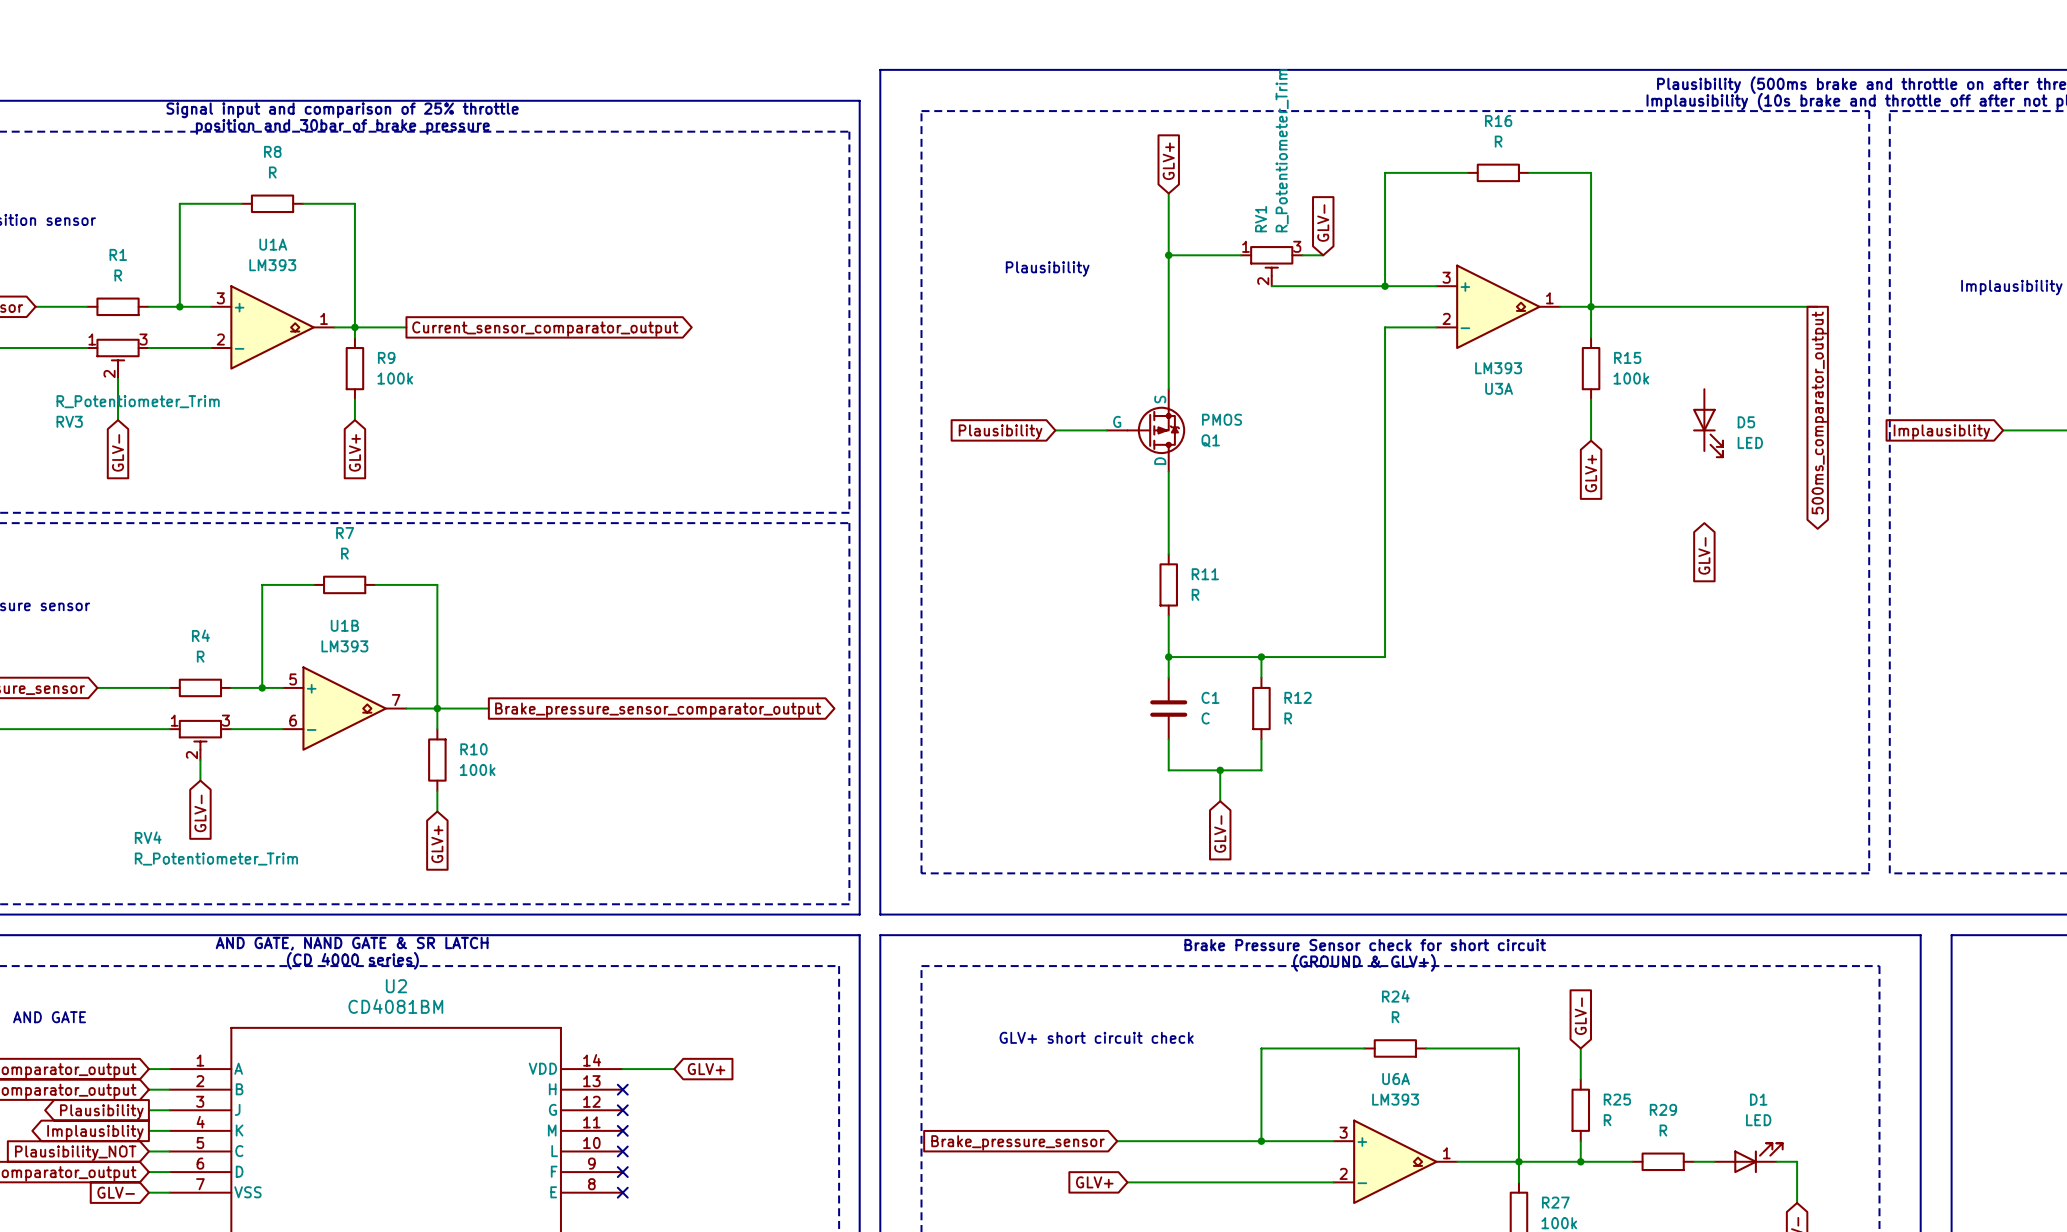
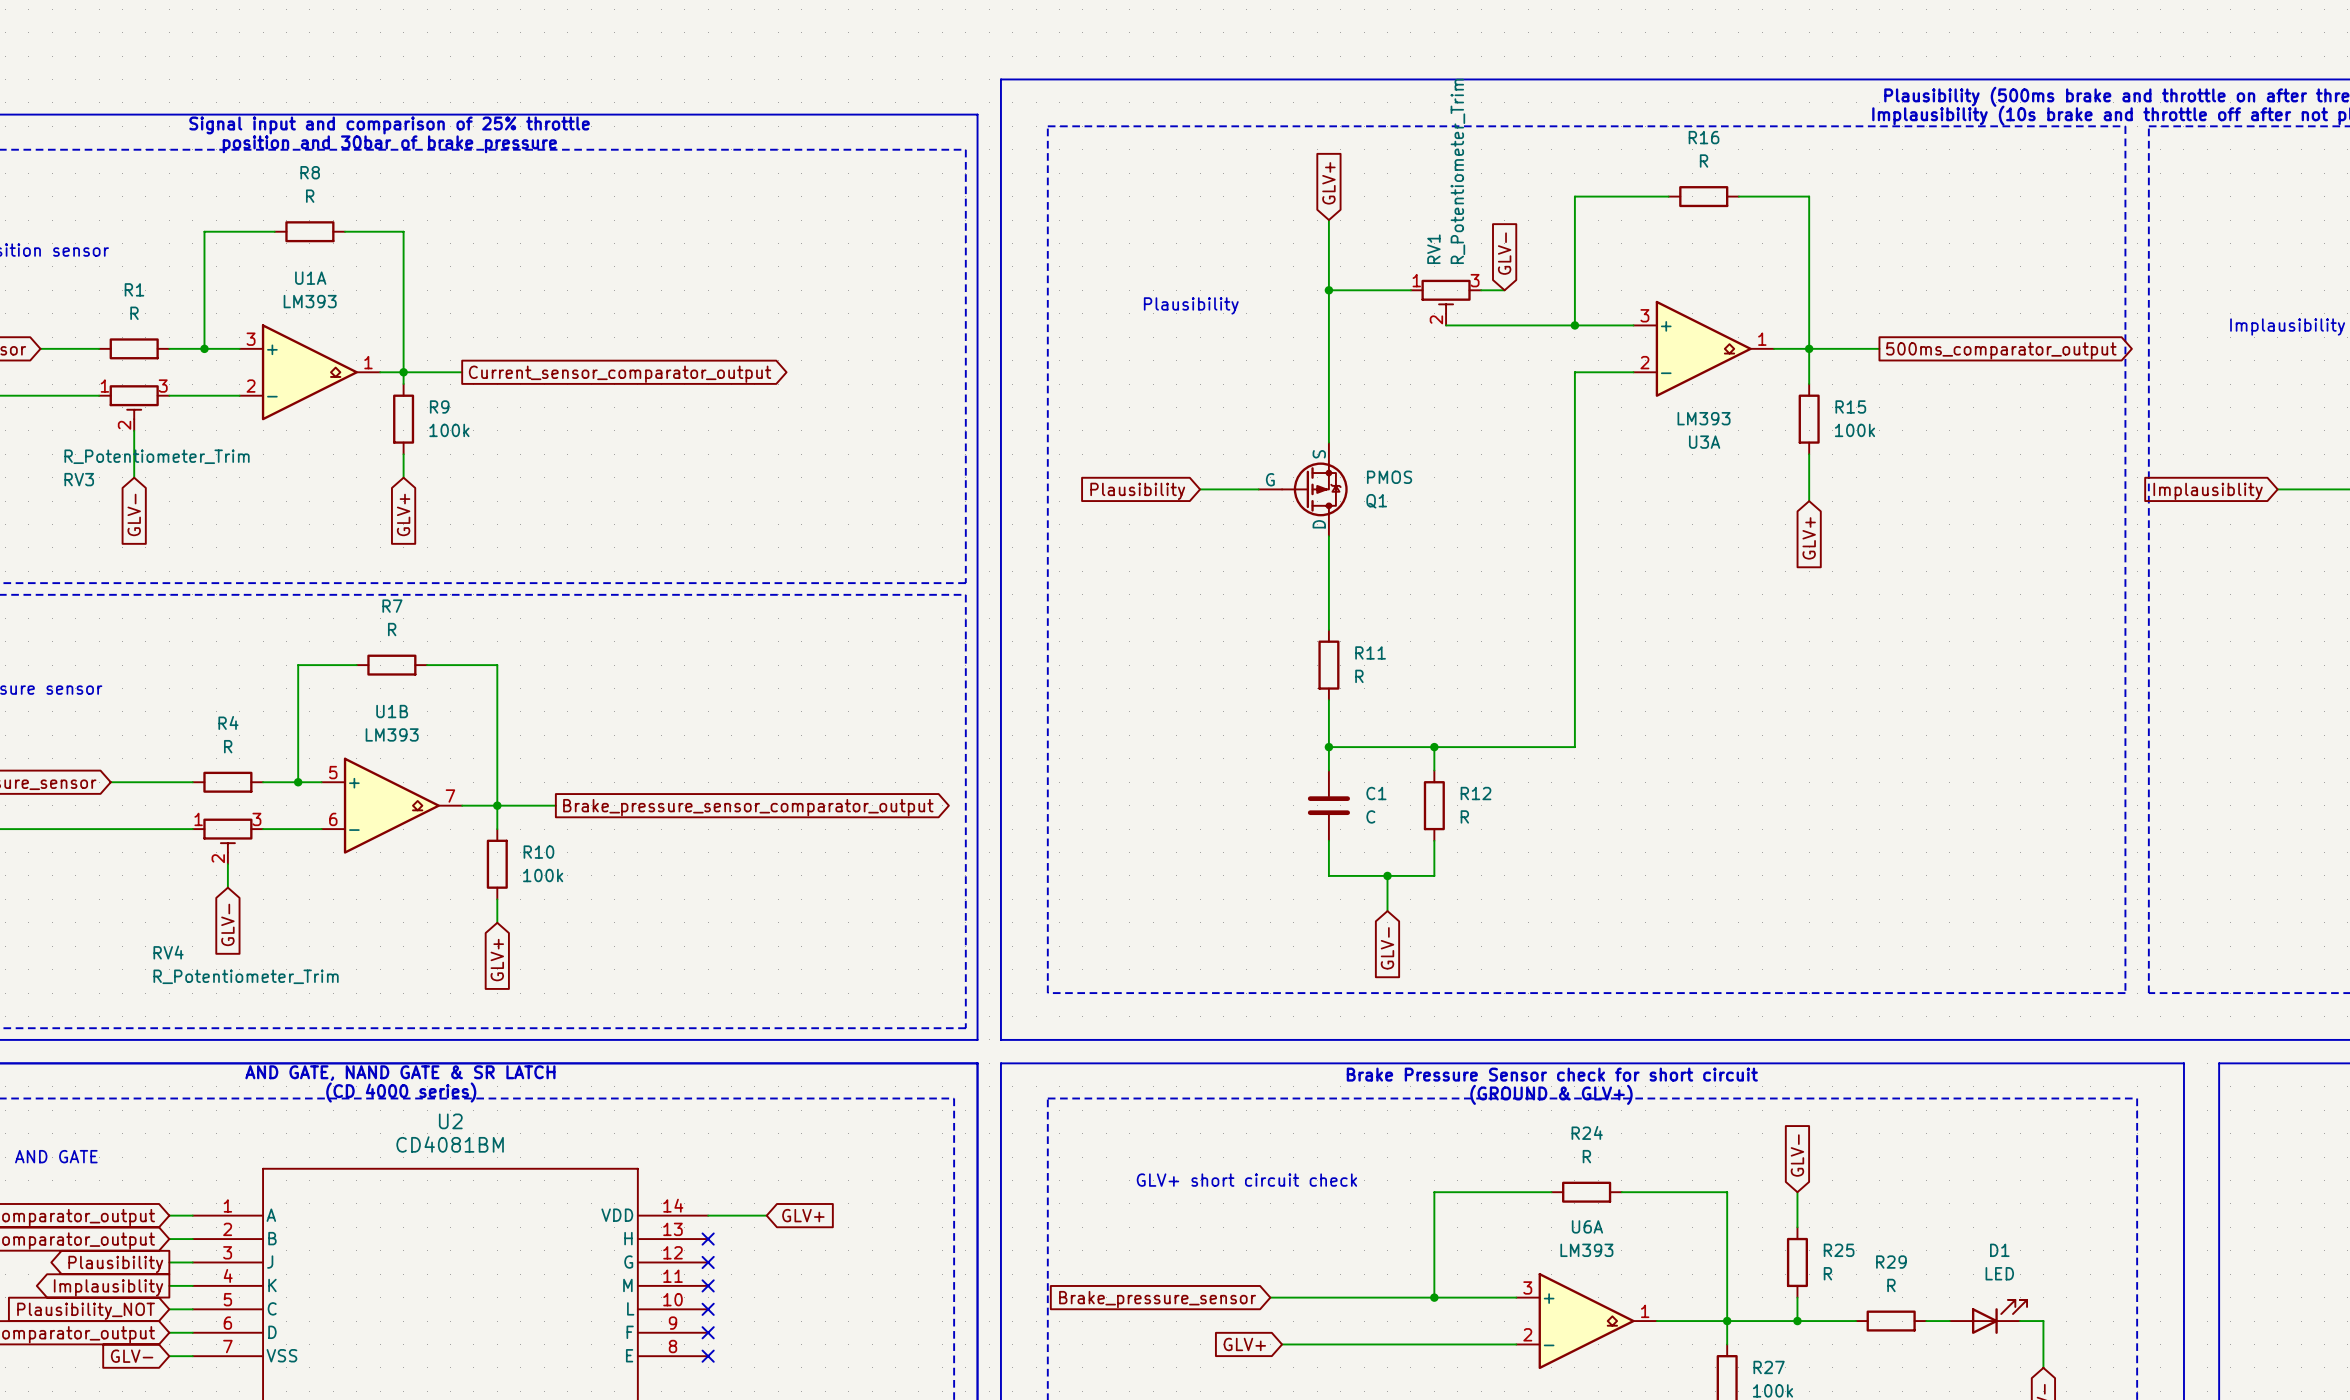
wire: (1652, 306) (1817, 306) -> none
global label rotation: 0° (1819, 413) -> 90° counterclockwise (2001, 350)
D5: LED (1707, 423) -> none
global label: GLV- (1704, 555) -> none

